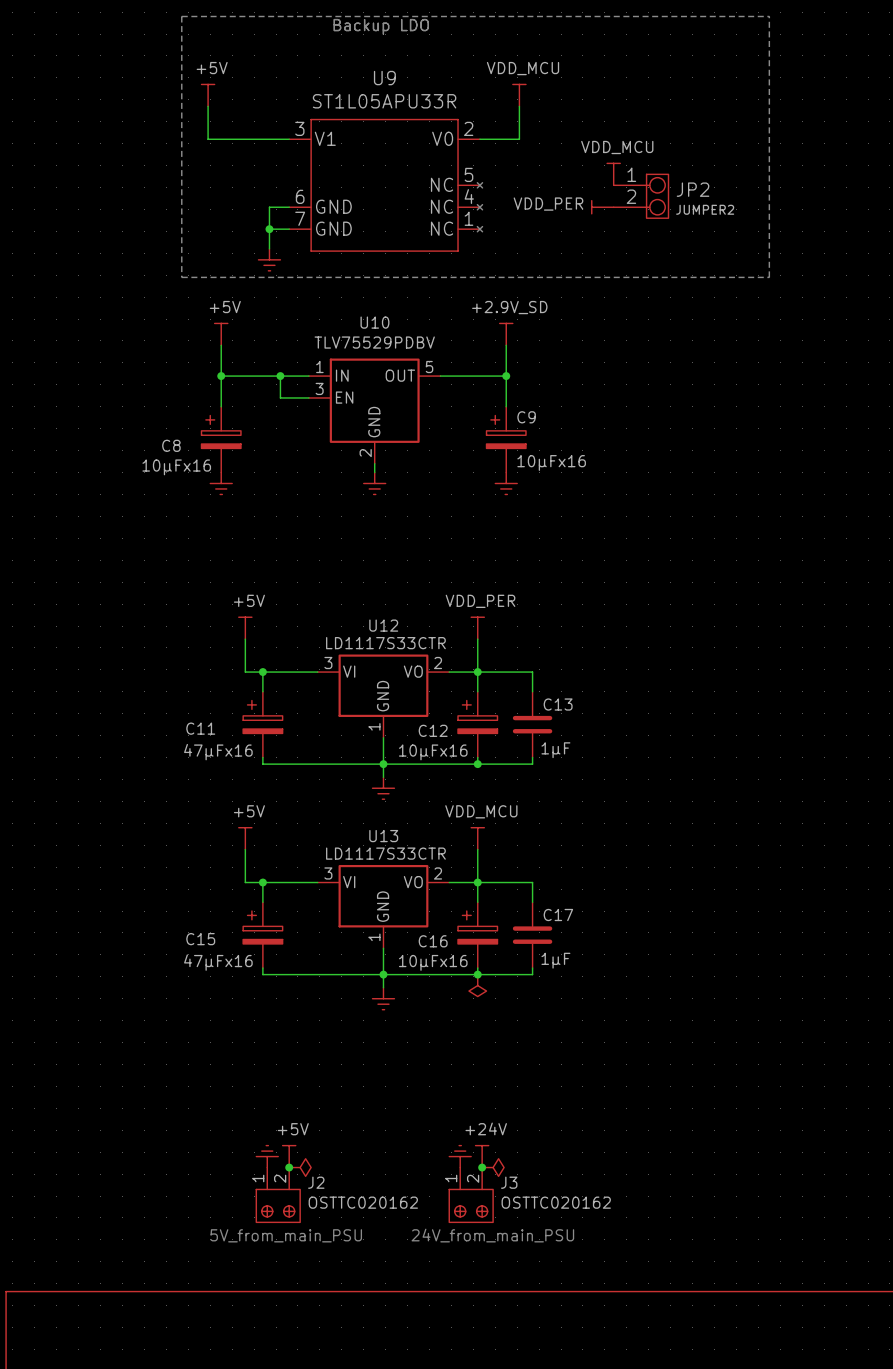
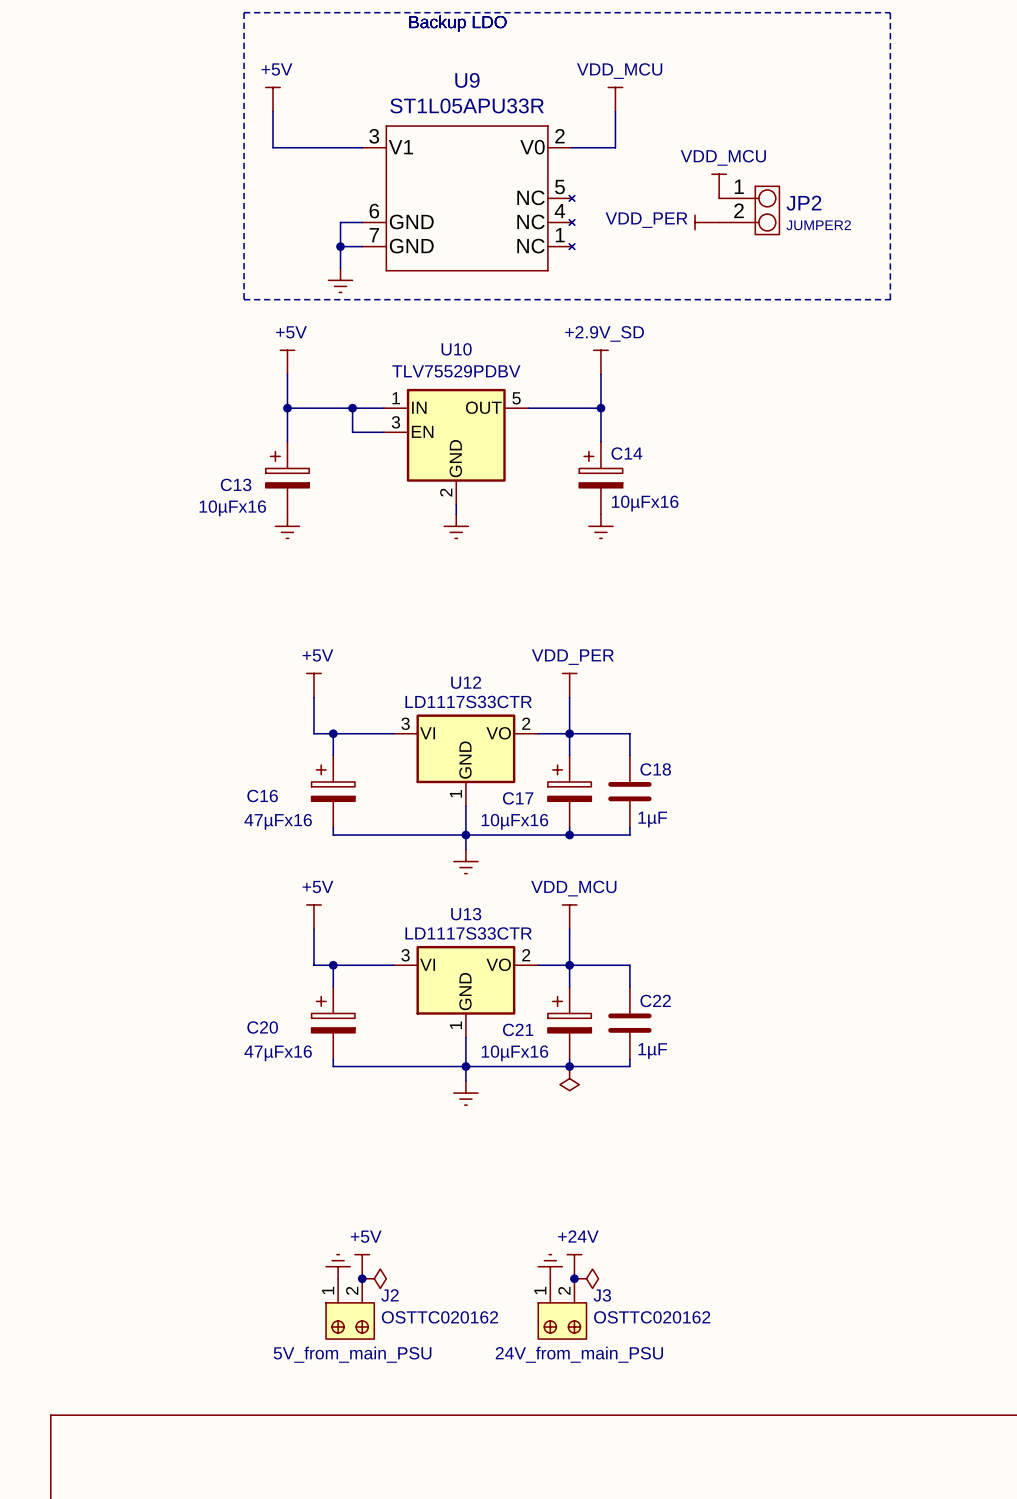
C9 name: C9 (526, 417) -> C14 (626, 453)
C8 name: C8 (171, 445) -> C13 (236, 484)
C13 name: C13 (558, 704) -> C18 (655, 769)
C11 name: C11 (200, 728) -> C16 (262, 795)
C12 name: C12 (433, 730) -> C17 (518, 798)
C17 name: C17 (558, 915) -> C22 (655, 1000)
C15 name: C15 (200, 939) -> C20 (262, 1027)
C16 name: C16 (433, 941) -> C21 (518, 1029)

